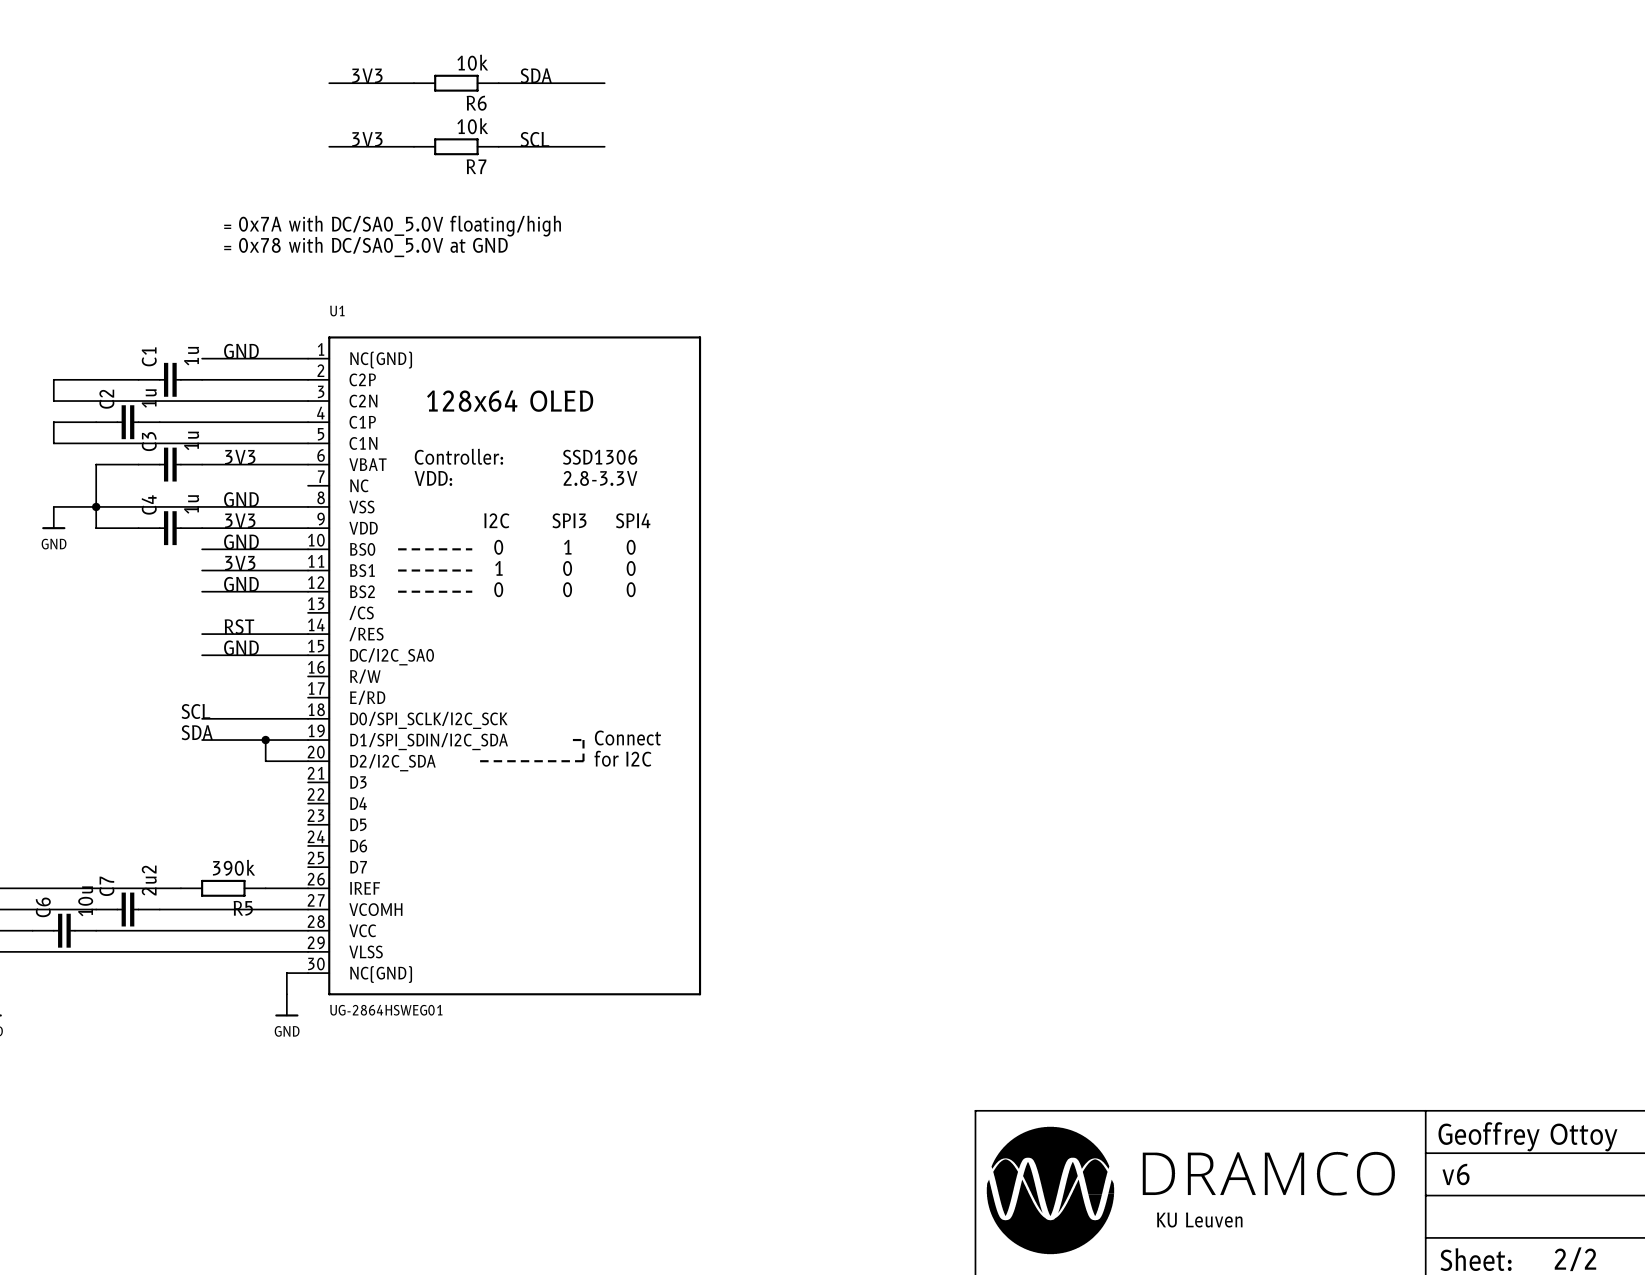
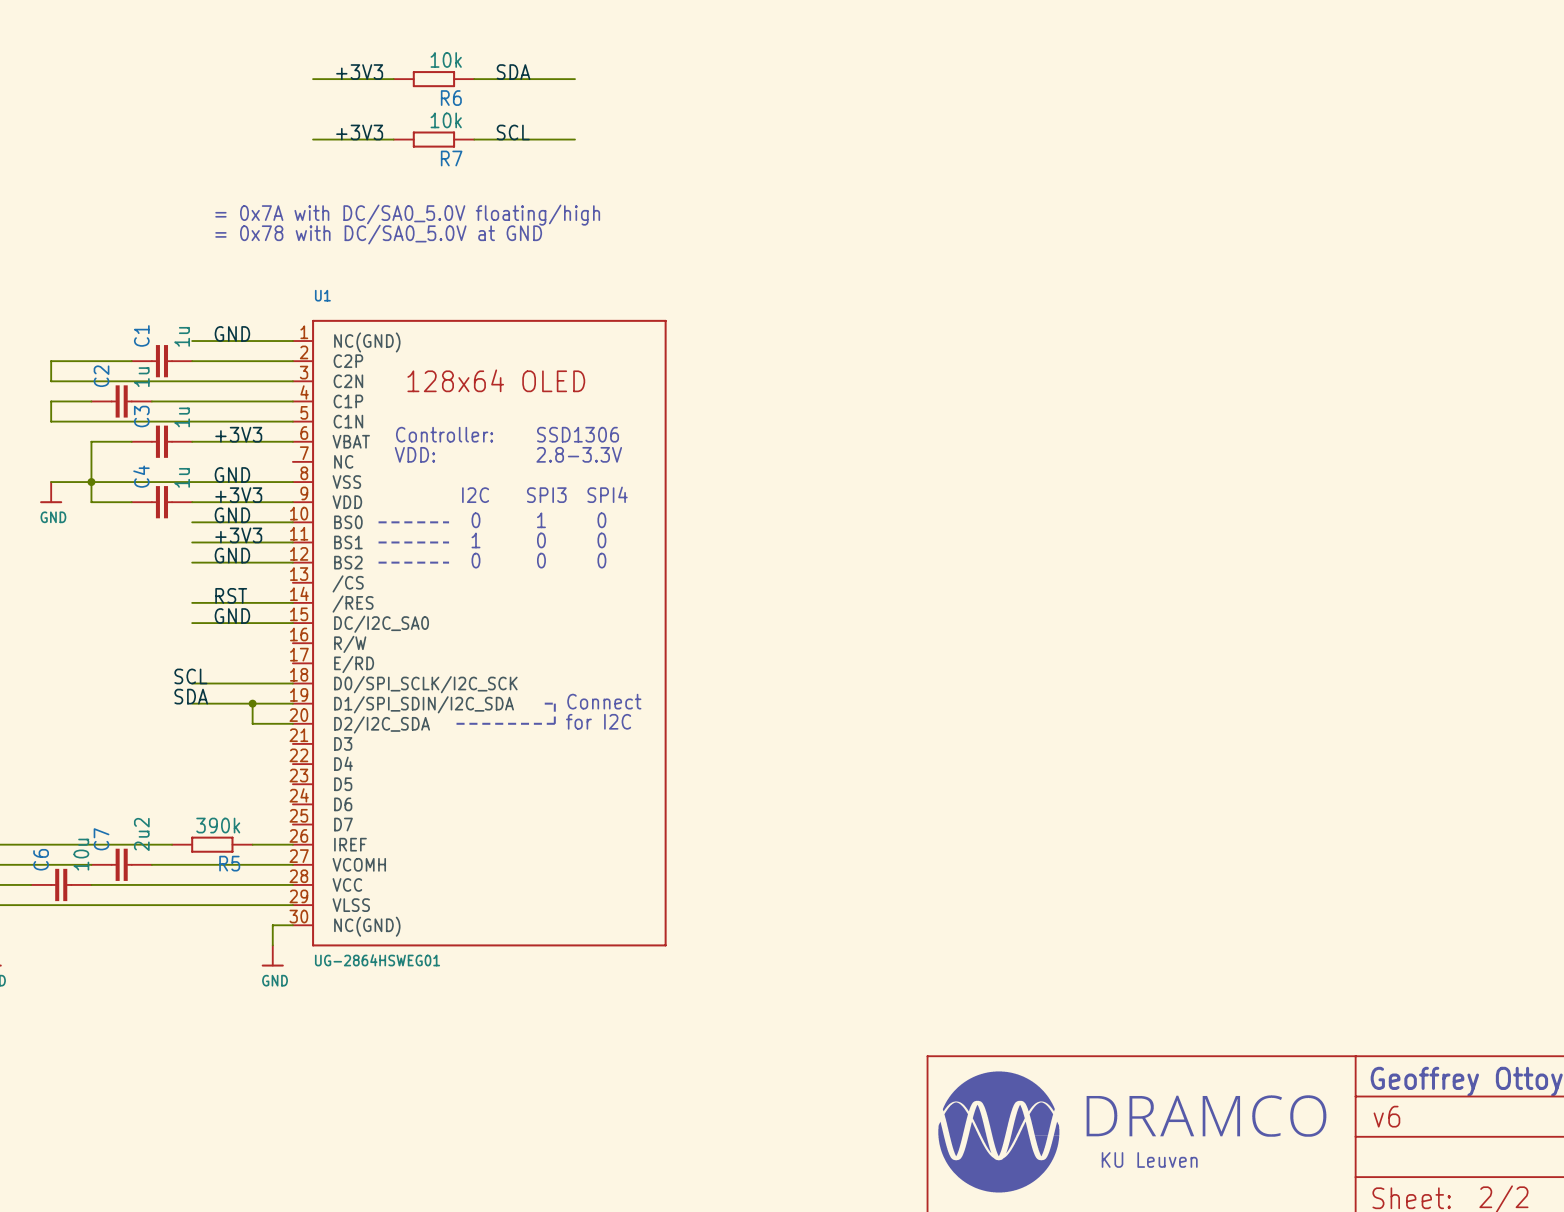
label: 3V3 (367, 75) -> +3V3 (359, 72)
label: 3V3 (367, 139) -> +3V3 (359, 132)
label: 3V3 (240, 457) -> +3V3 (238, 434)
label: 3V3 (240, 520) -> +3V3 (238, 495)
label: 3V3 (240, 563) -> +3V3 (238, 535)

